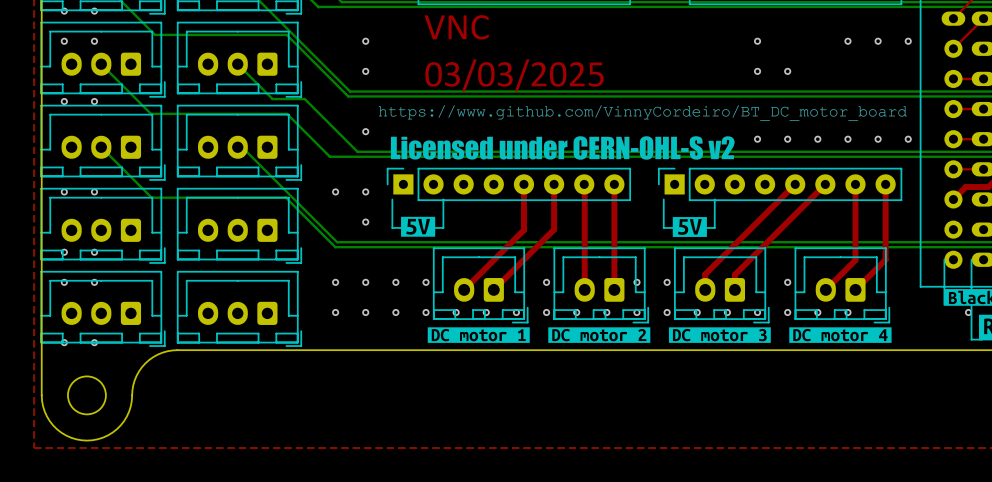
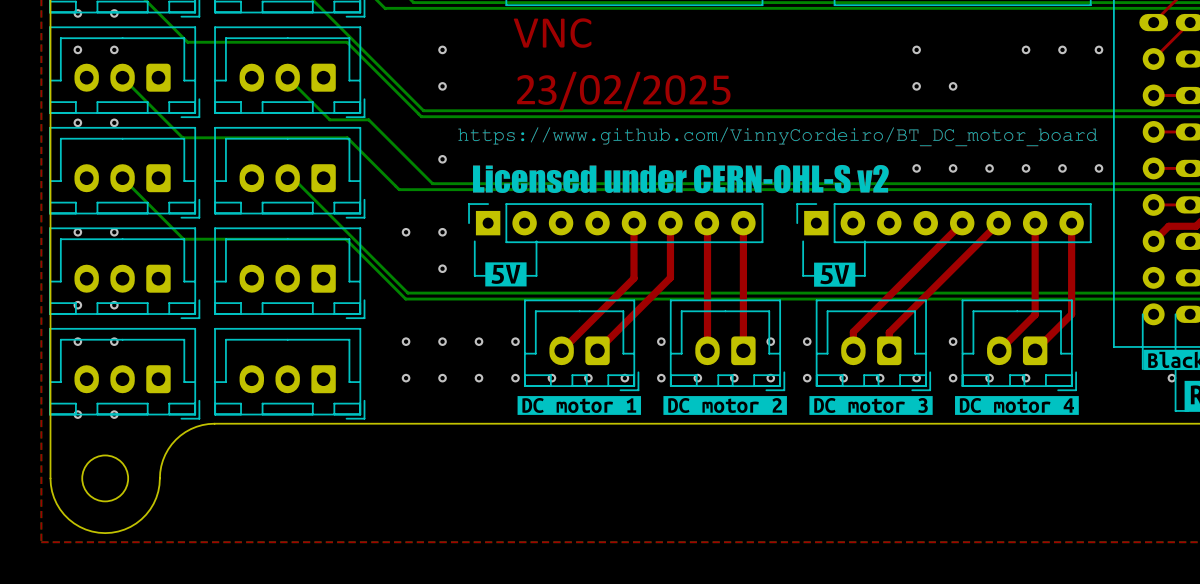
drawing: none -> [517, 75, 536, 105]
drawing: [478, 62, 495, 87] -> none
drawing shape: [497, 62, 513, 87] -> [603, 75, 622, 105]
drawing position: (433, 74) -> (589, 89)

